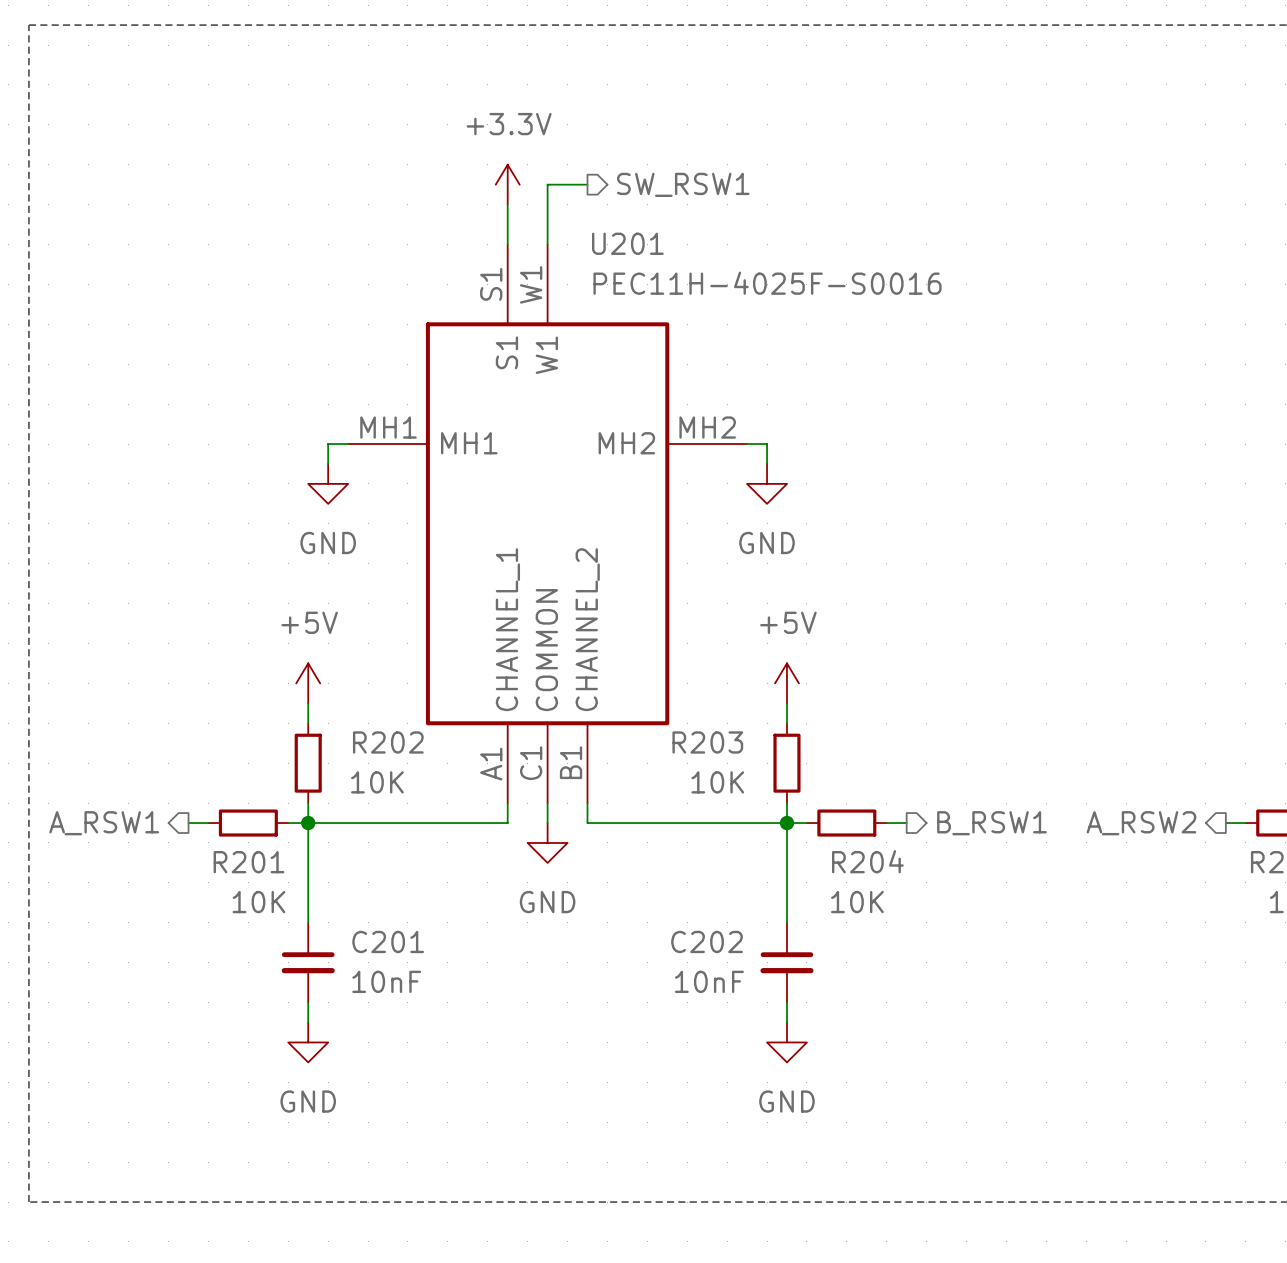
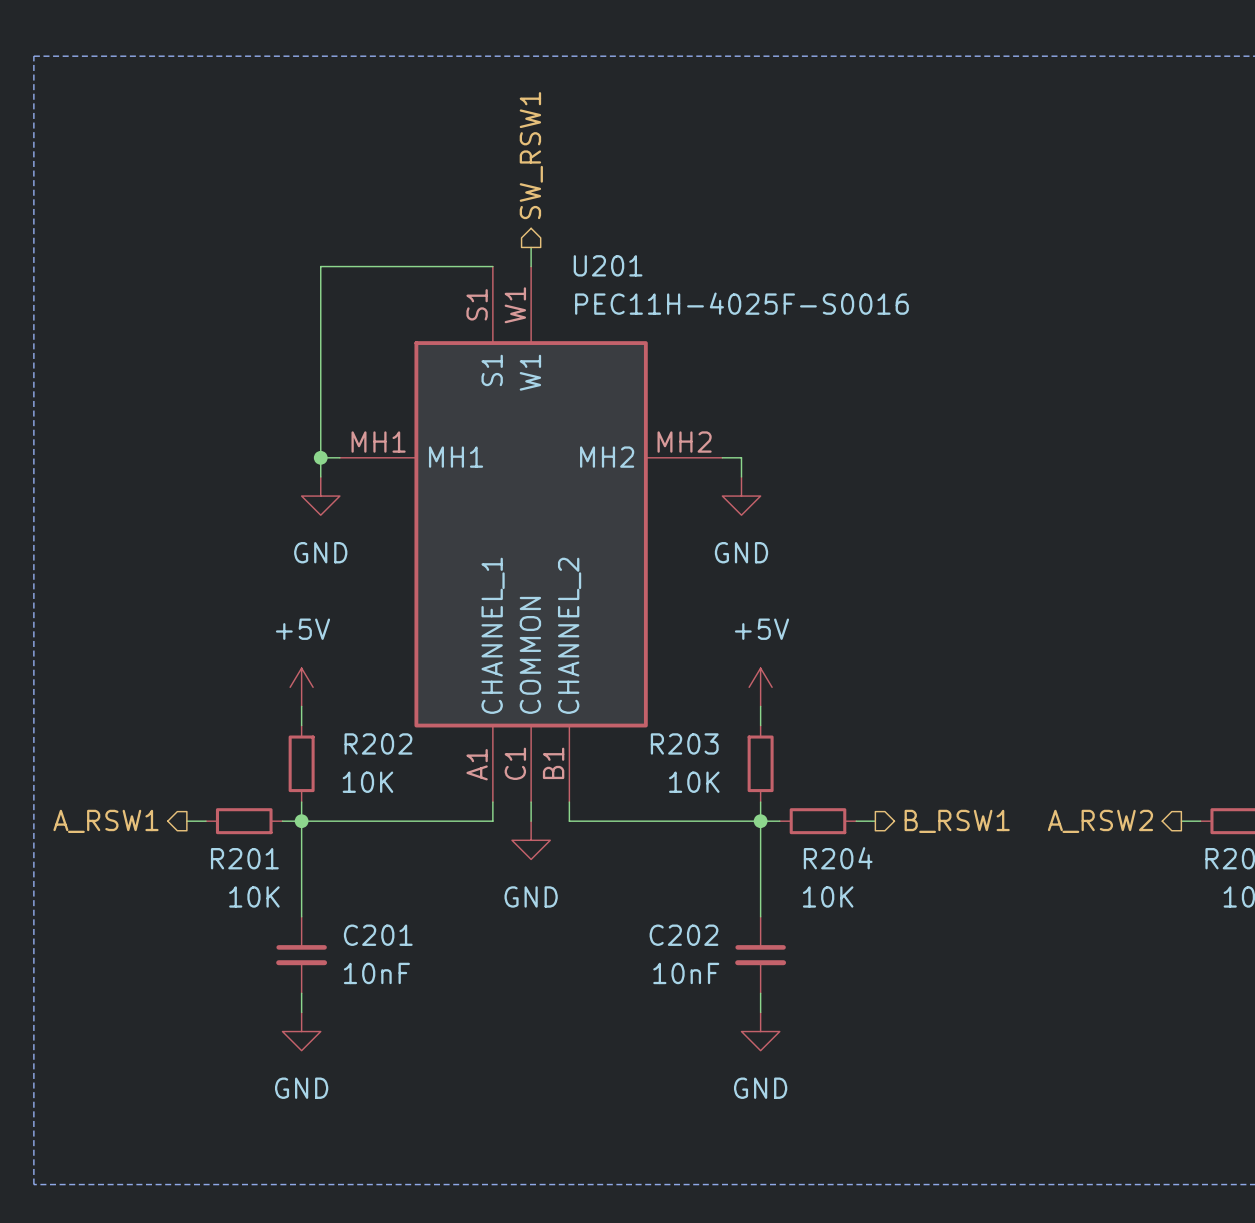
power symbol: +3.3V (507, 184) -> none
wire: (587, 184) (547, 184) (547, 224) -> none
hierarchical label rotation: 0° (683, 184) -> 90° counterclockwise (531, 155)
wire: (507, 204) (507, 244) -> (320, 457) (320, 266) (492, 266)
junction: none -> (320, 457)

